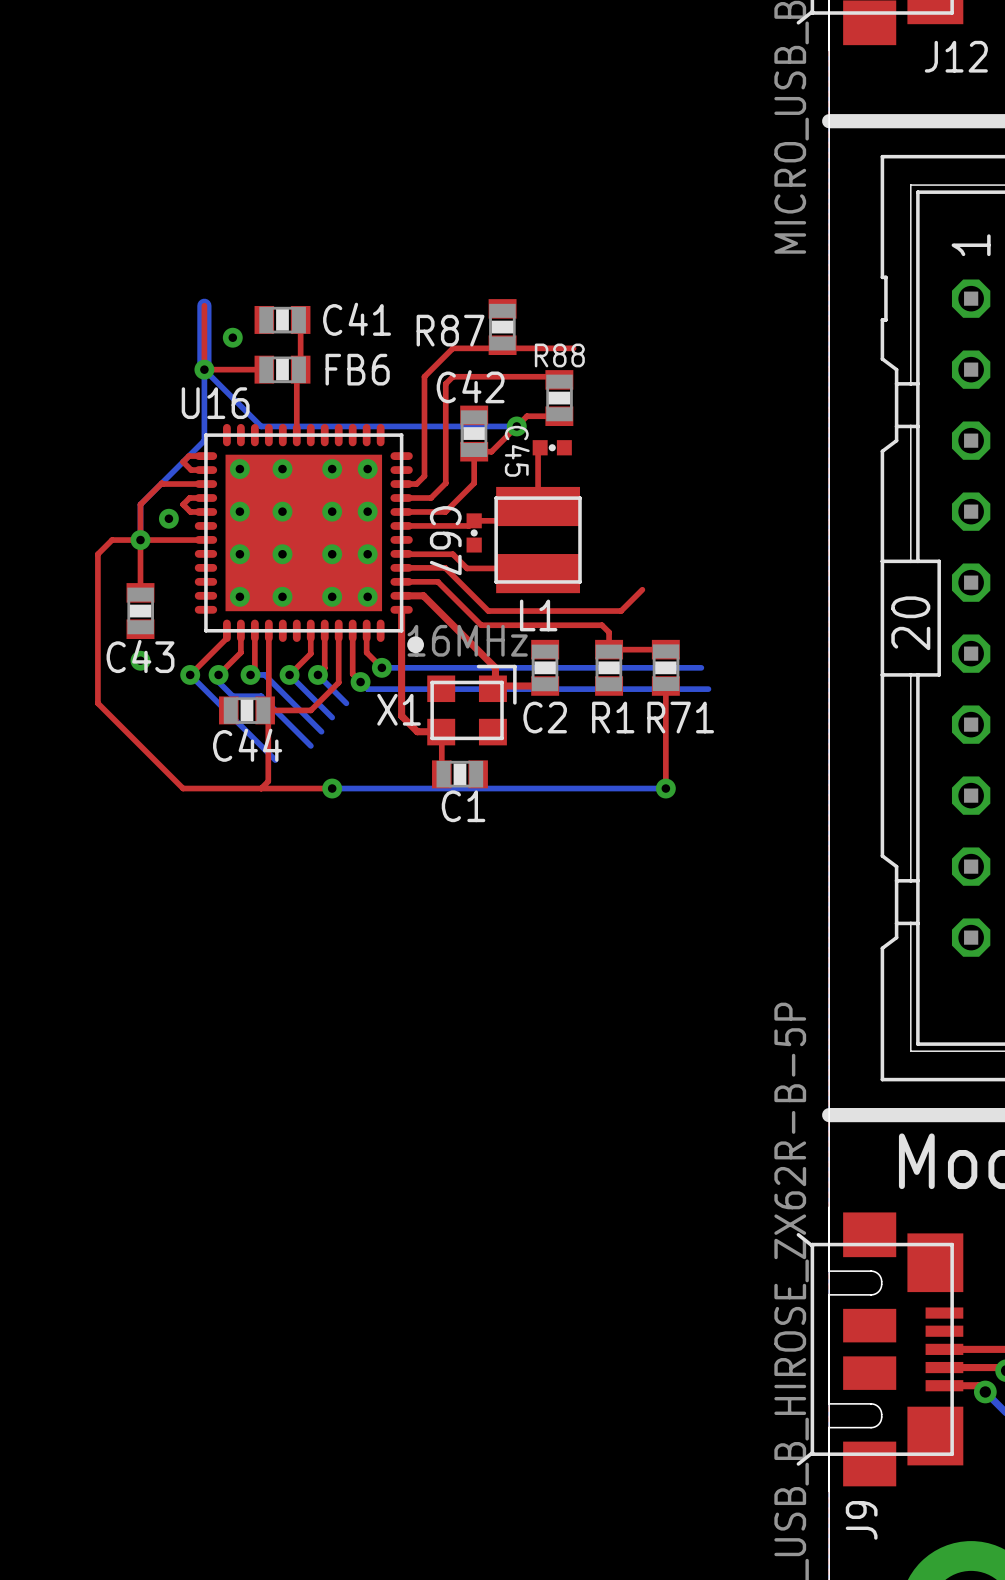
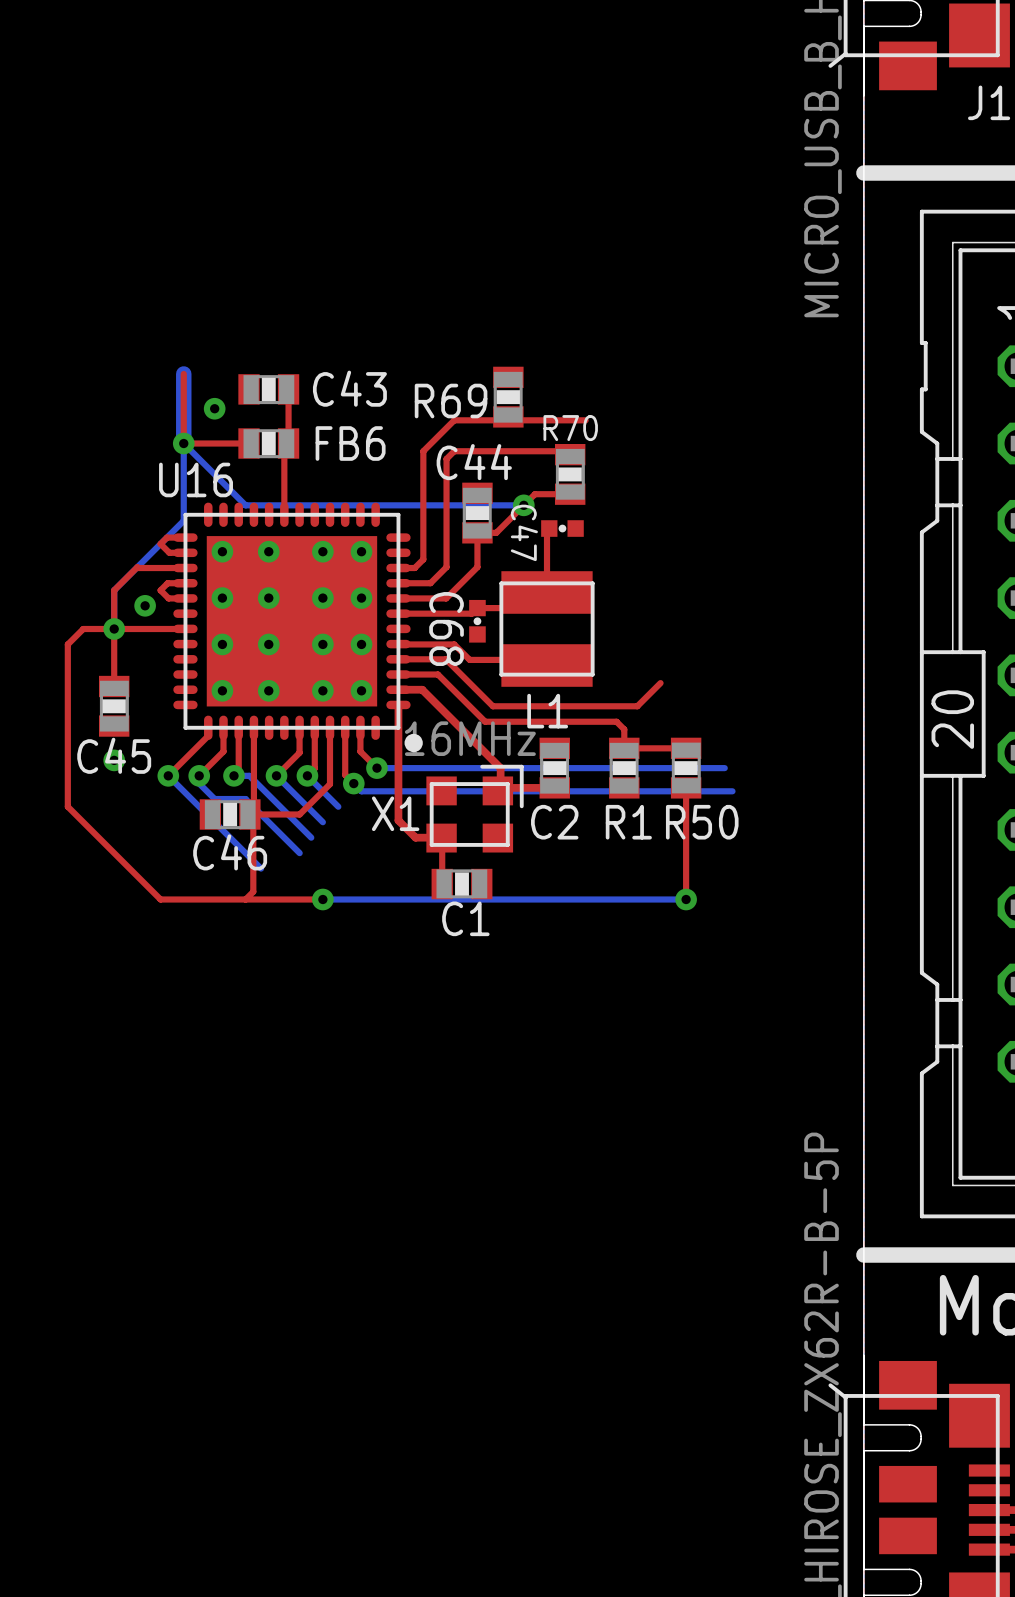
C41 name: C41 (357, 319) -> C43 (349, 388)
R87 name: R87 (450, 330) -> R69 (451, 401)
R88 name: R88 (559, 355) -> R70 (570, 428)
C42 name: C42 (470, 386) -> C44 (474, 462)
C45 name: C45 (517, 451) -> C47 (524, 532)
C67 name: C67 (445, 540) -> C68 (446, 629)
C43 name: C43 (140, 656) -> C45 (114, 755)
R71 name: R71 (680, 717) -> R50 (702, 822)
C44 name: C44 (247, 745) -> C46 (230, 852)

